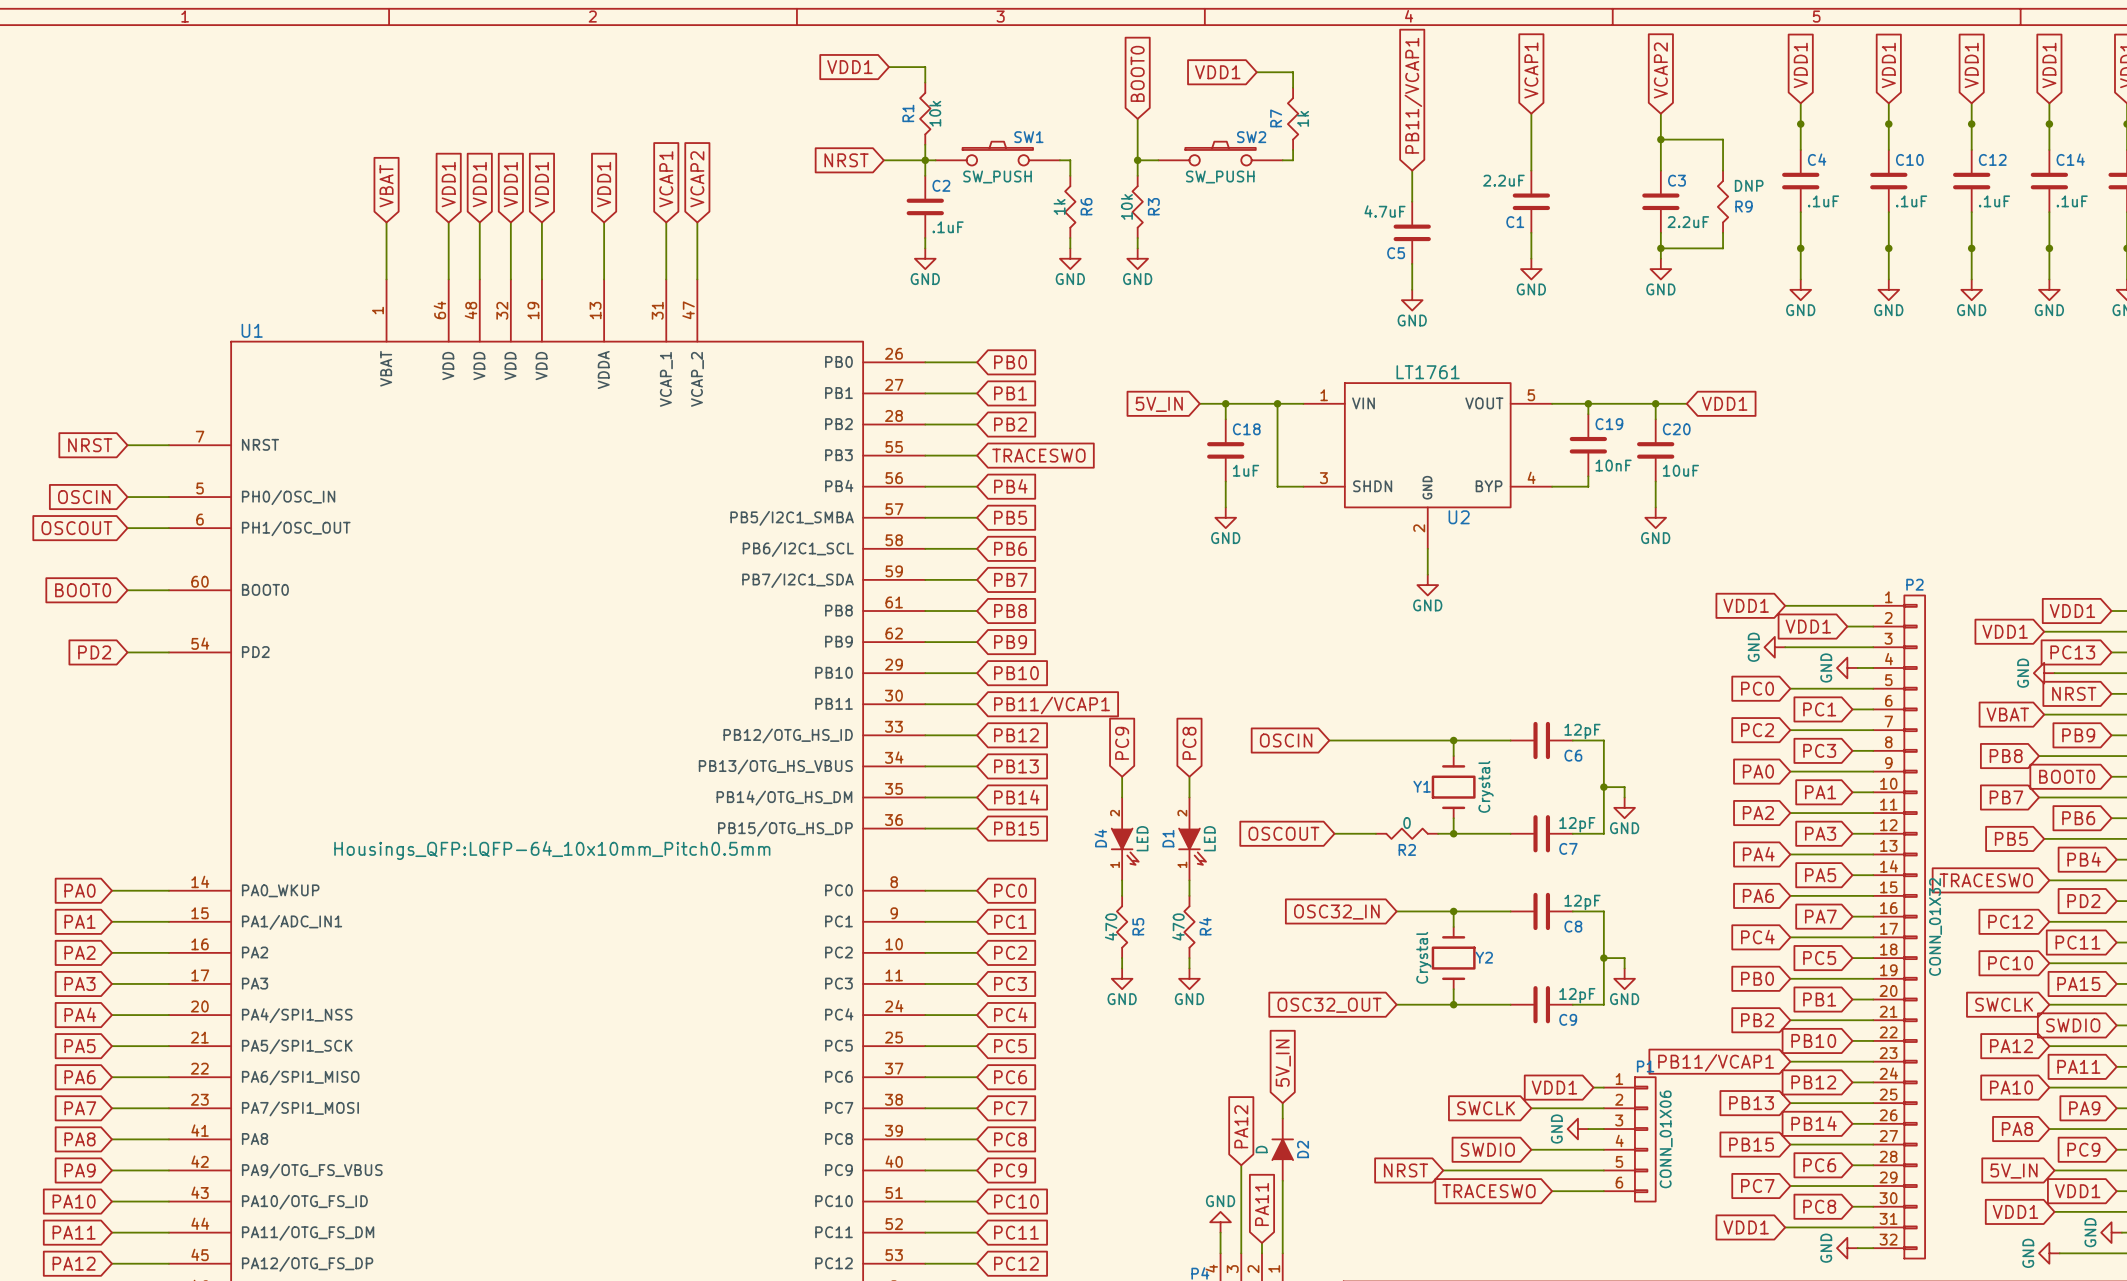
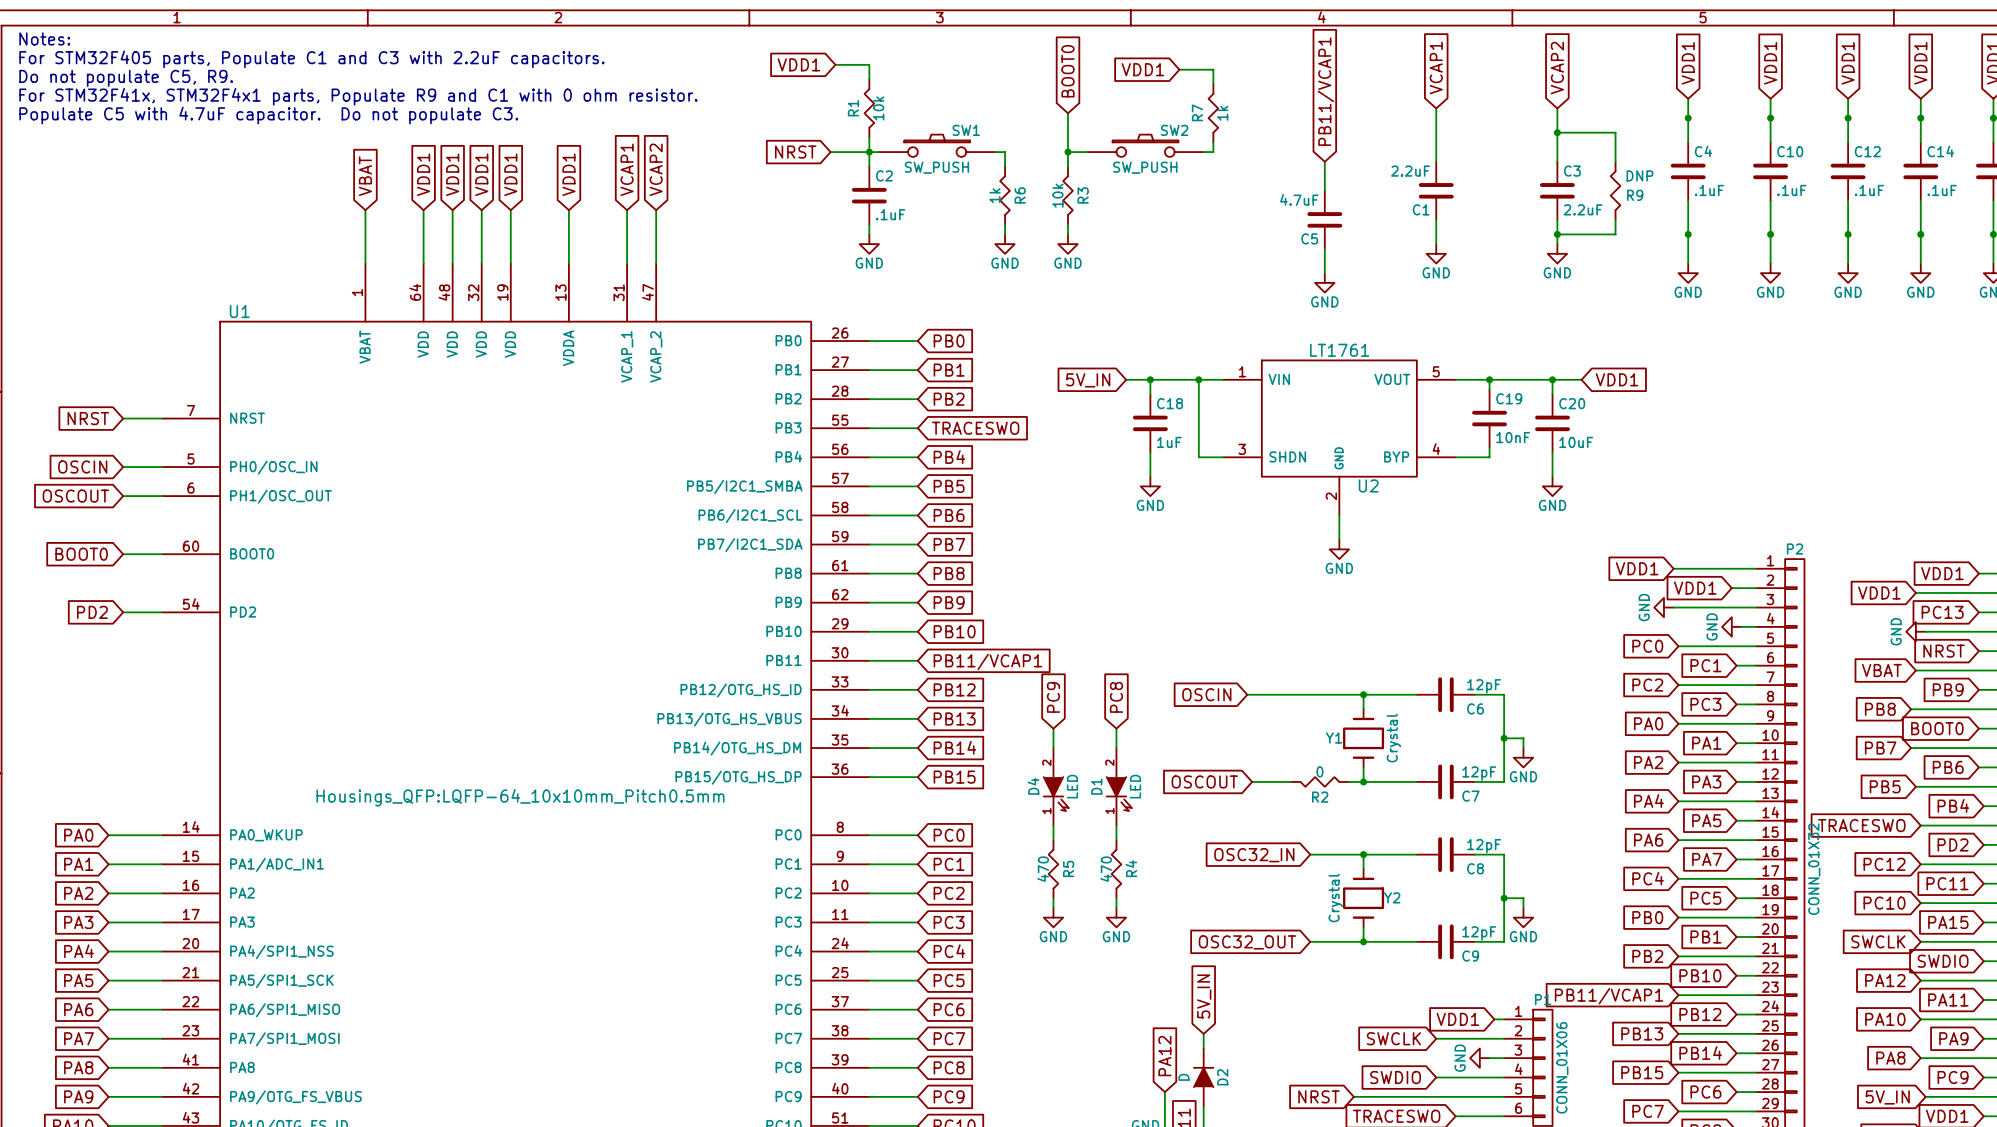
text: none -> Notes: (44, 38)
text: none -> For STM32F405 parts, Populate C1 and C3 with 2.2uF capacitors. (311, 59)
text: none -> Do not populate C5, R9. (126, 78)
text: none -> For STM32F41x, STM32F4x1 parts, Populate R9 and C1 with 0 ohm resistor. (358, 96)
text: none -> Populate C5 with 4.7uF capacitor. Do not populate C3. (268, 115)

